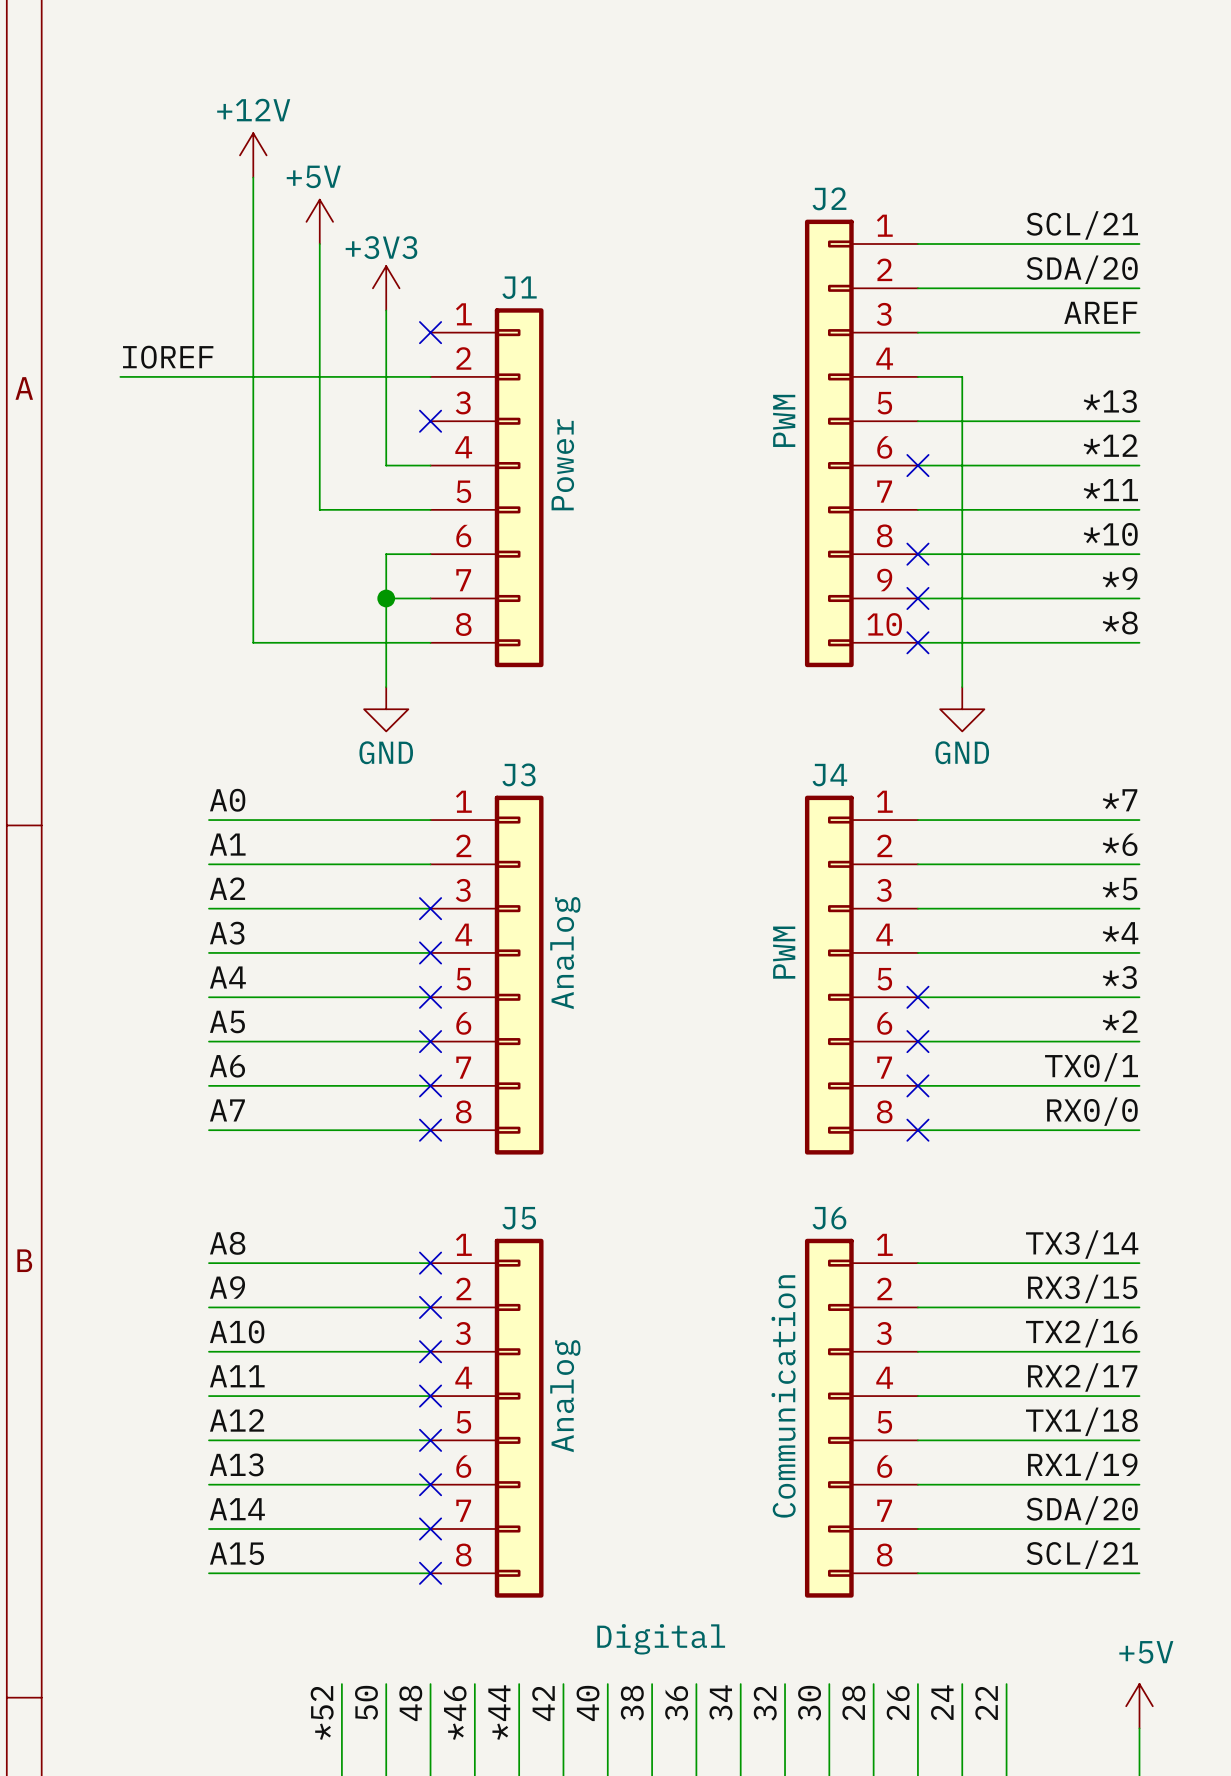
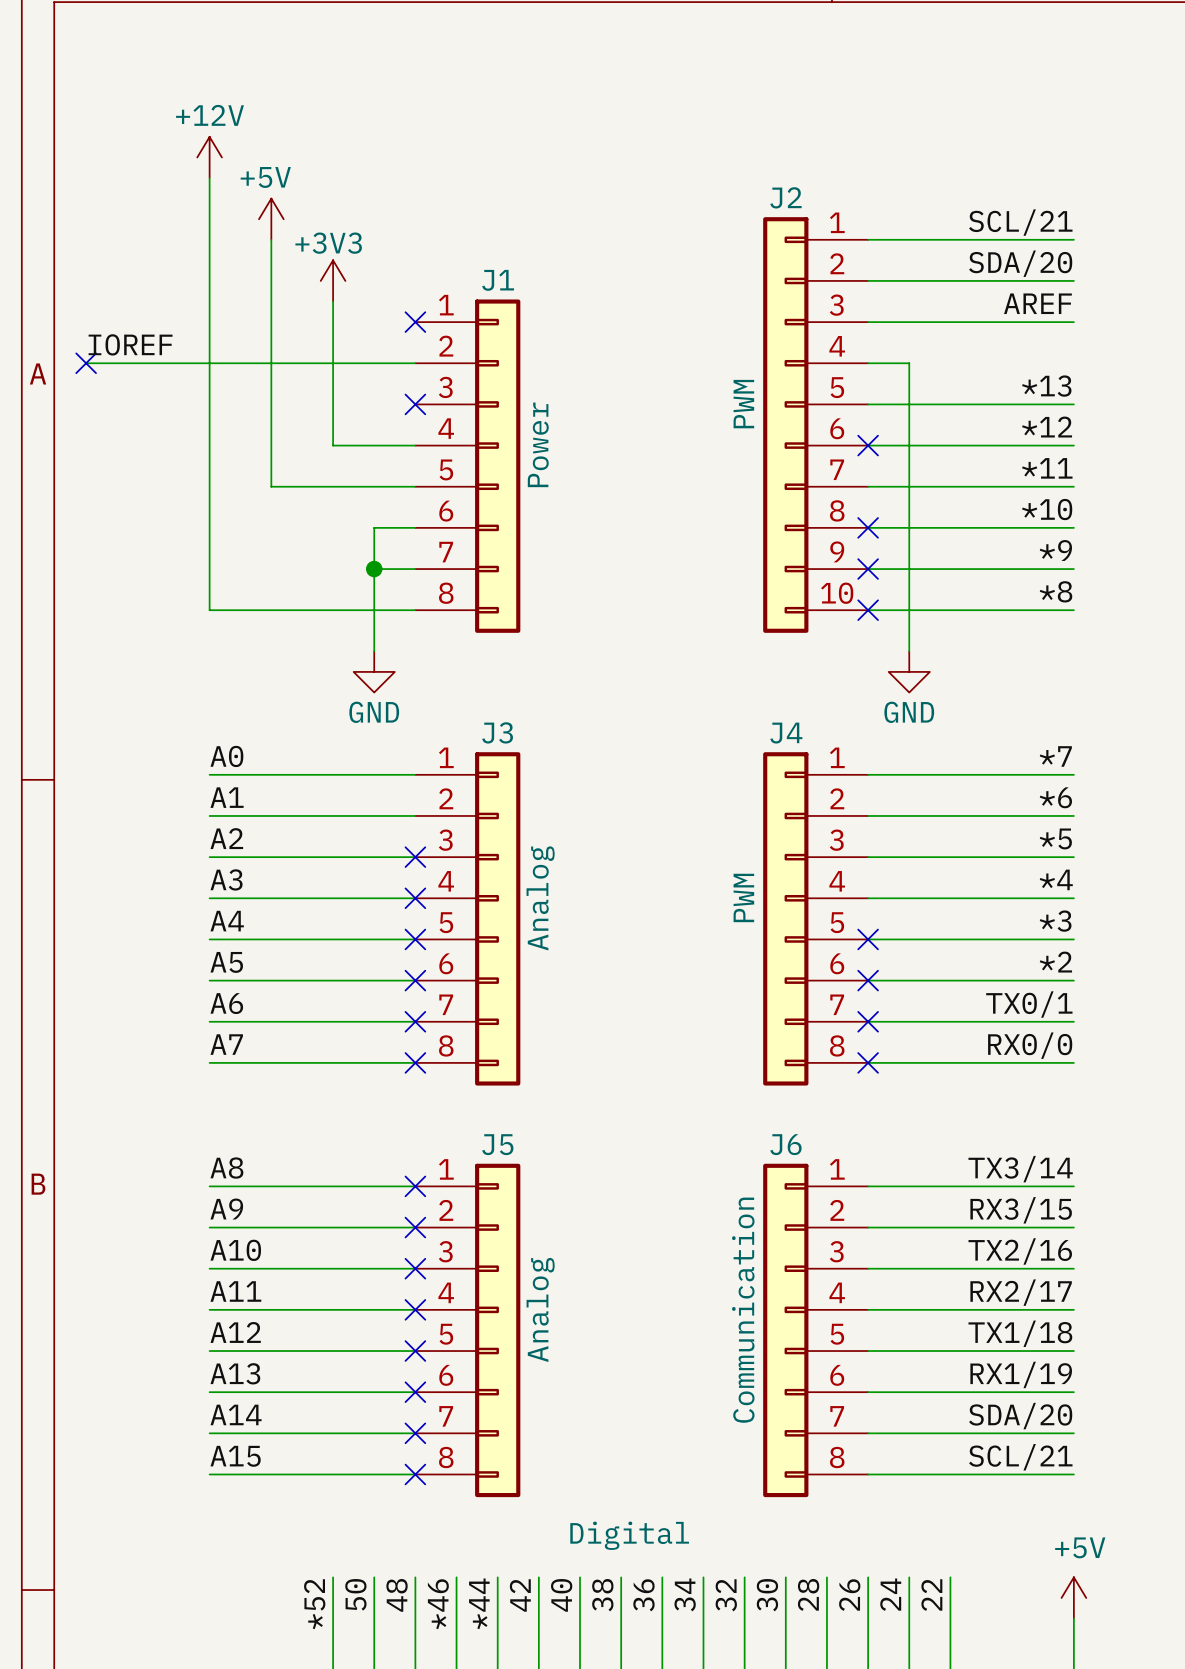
power symbol position: +12V (253, 155) -> +12V (209, 157)
wire: (253, 177) (253, 642) -> (209, 178) (209, 610) (250, 610)
power symbol position: +5V (319, 221) -> +5V (271, 219)
wire: (319, 244) (319, 509) -> (271, 239) (271, 486) (312, 486)
power symbol position: +3V3 (386, 288) -> +3V3 (333, 280)
wire: (386, 310) (386, 465) -> (333, 301) (333, 445) (374, 445)
label position: IOREF (168, 357) -> IOREF (130, 344)
wire: none -> (86, 363) (127, 363)
no-connect mark: none -> (86, 363)

